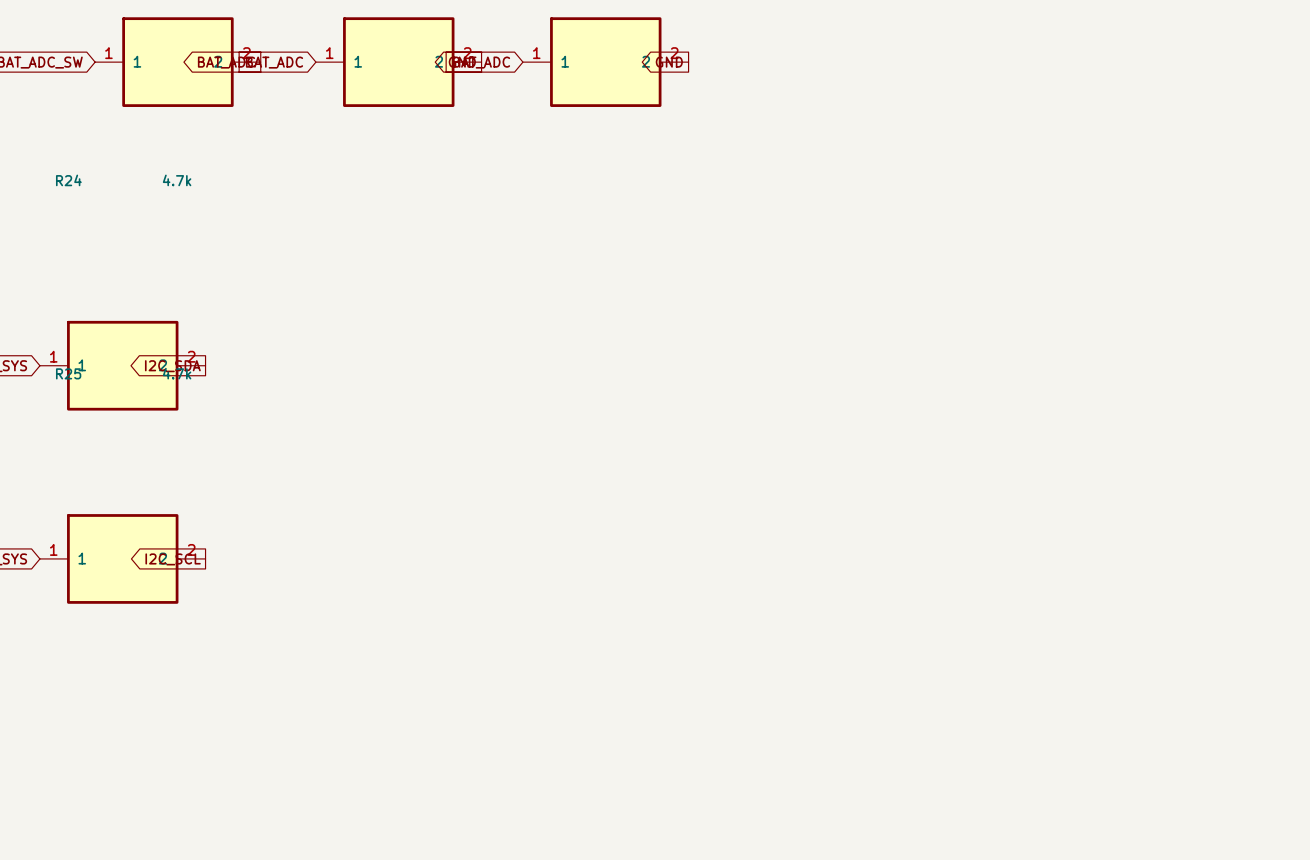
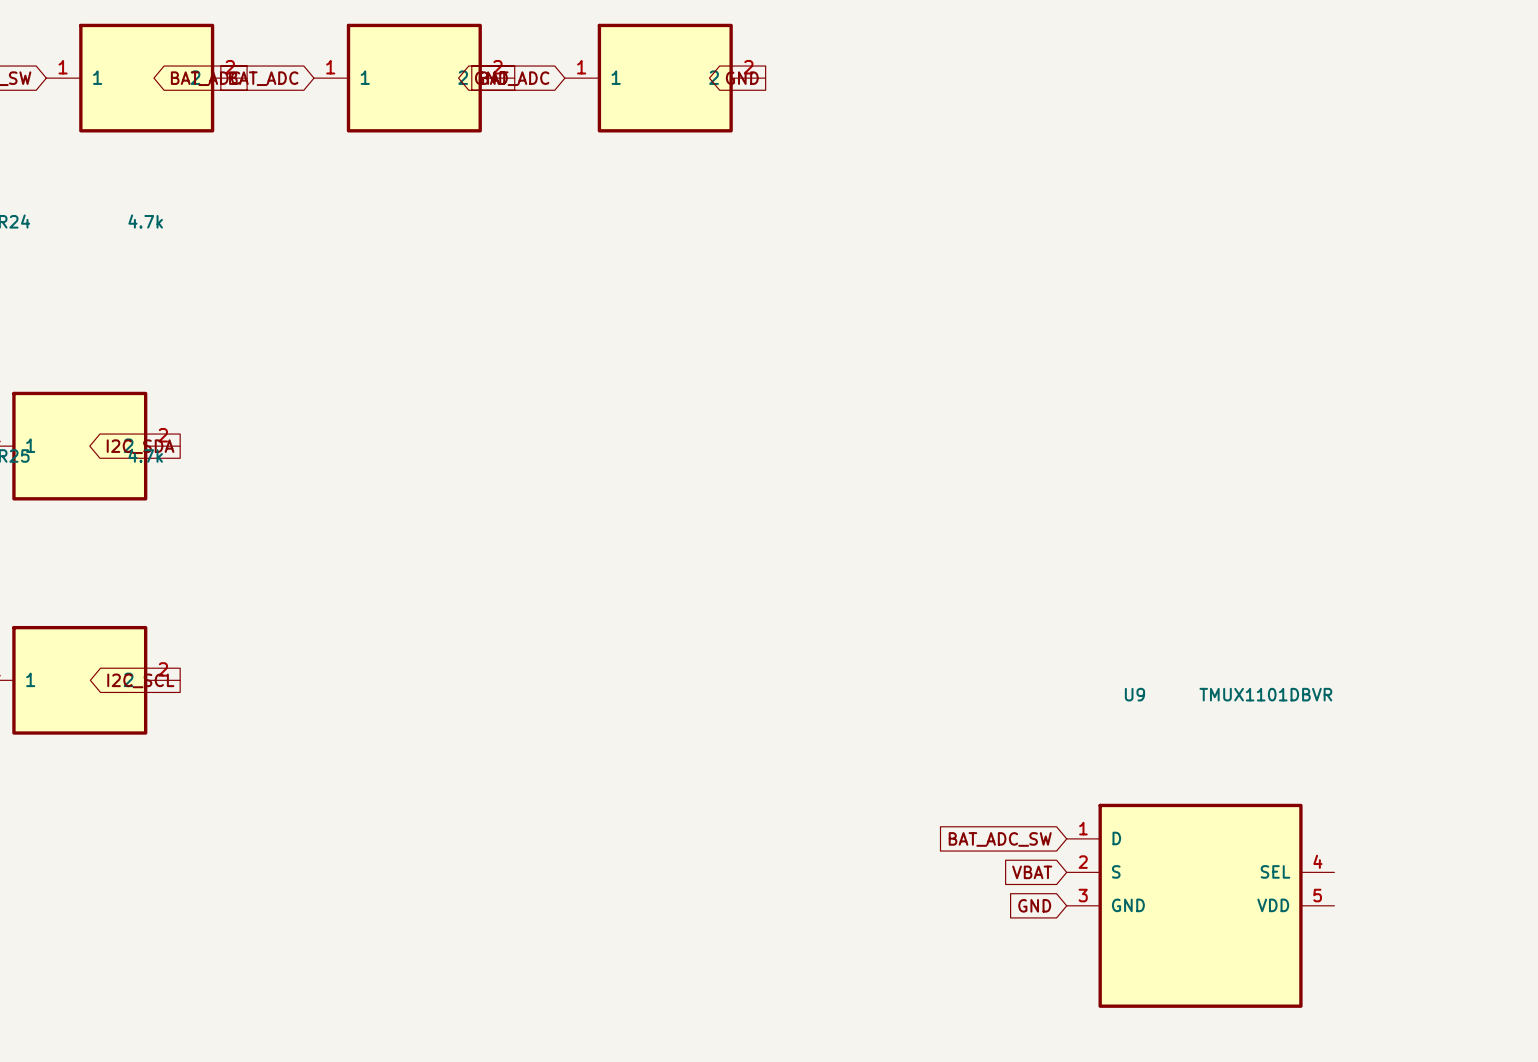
global label: none -> BAT_ADC_SW (1000, 839)
global label: none -> VBAT (1032, 872)
global label: none -> GND (1034, 905)
U9: none -> TMUX1101DBVR (1200, 905)

